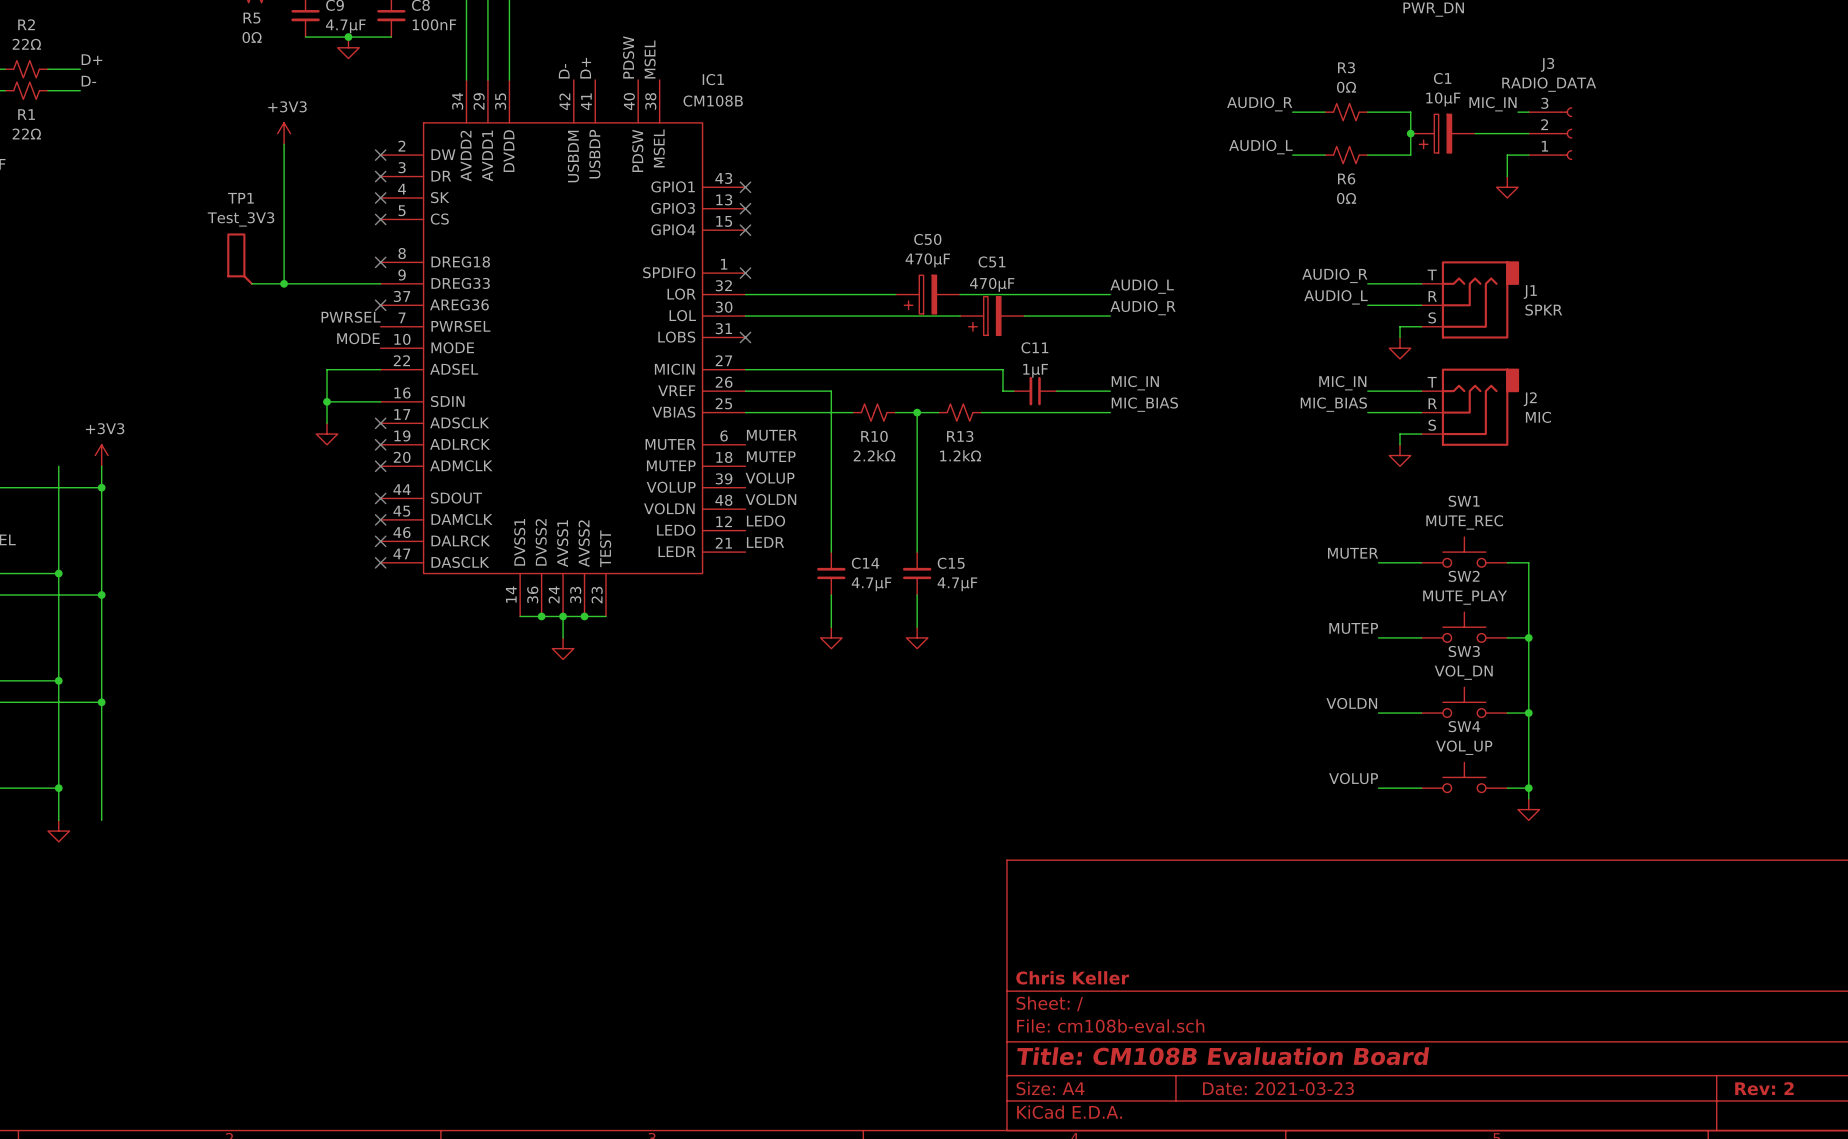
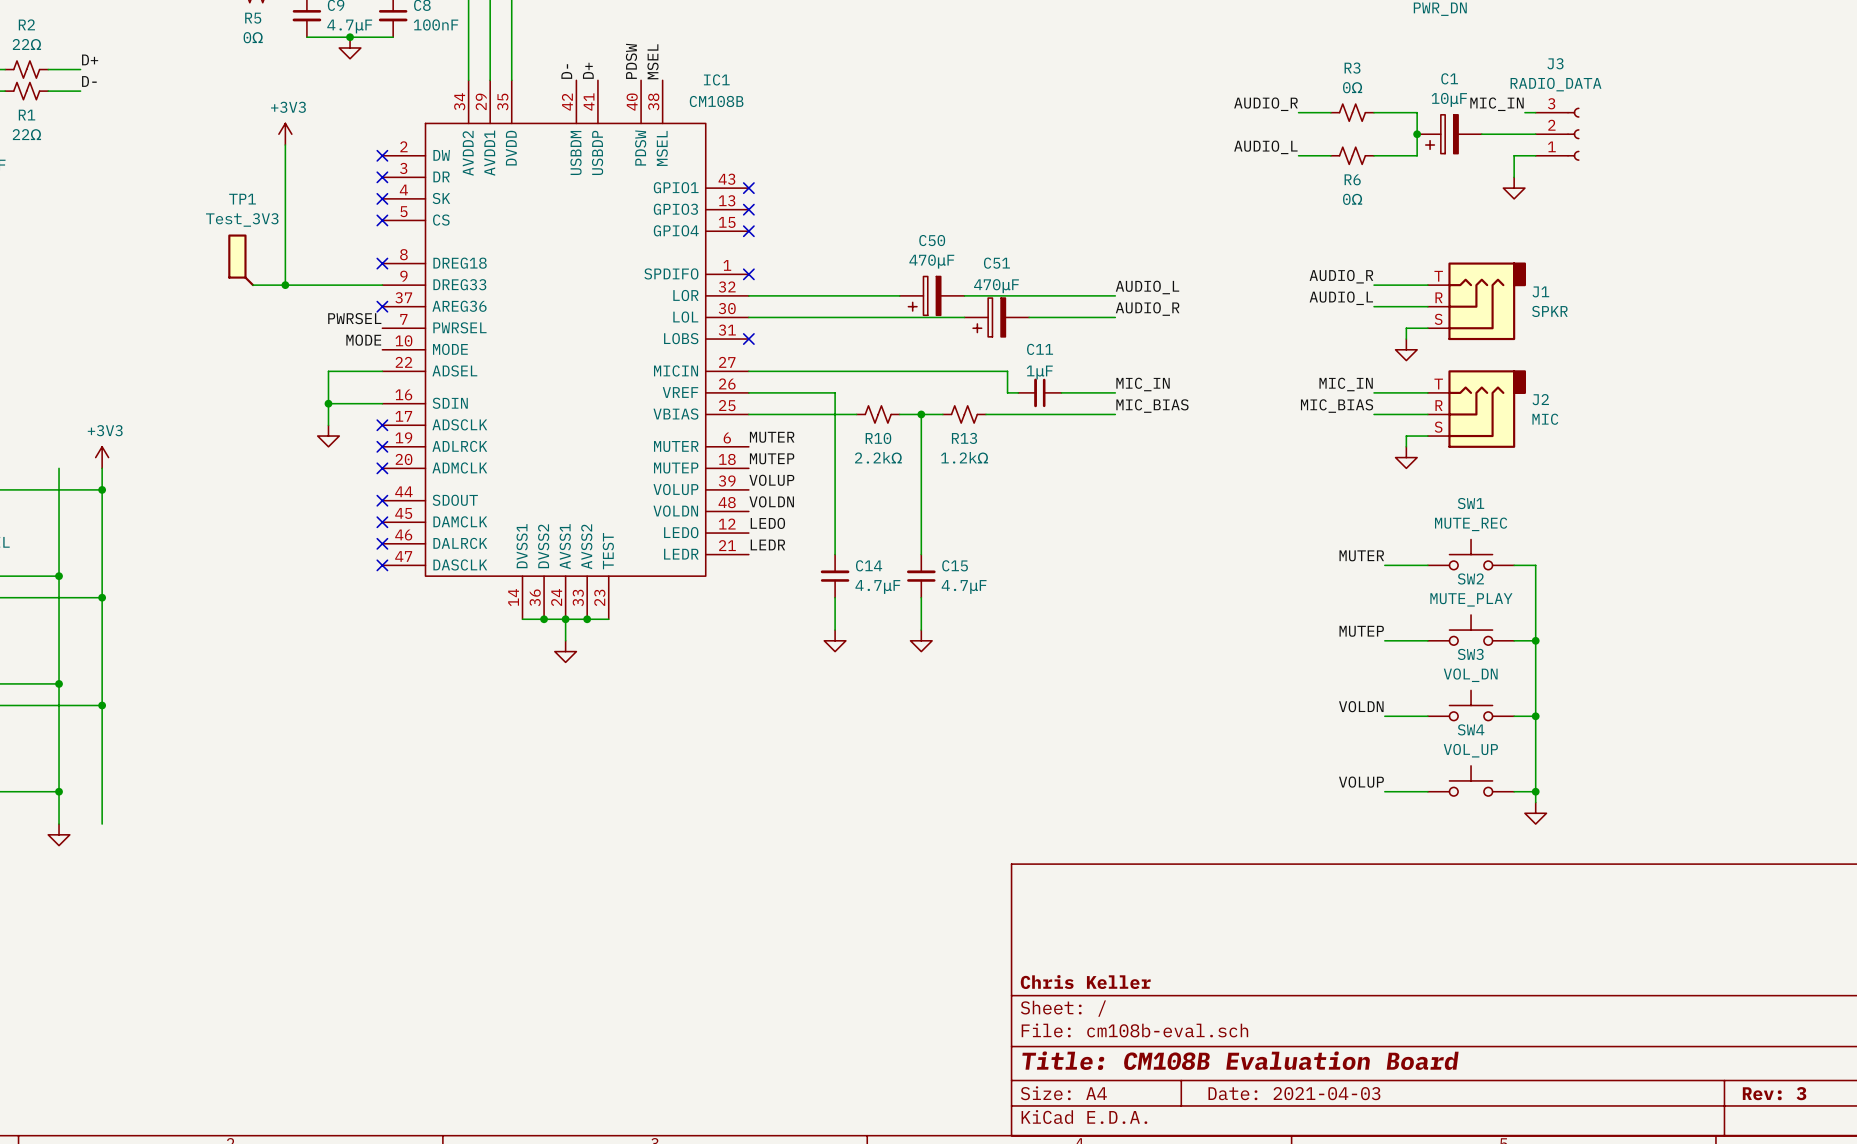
title block: Date: 2021-03-23 (1278, 1088) -> Date: 2021-04-03 (1294, 1093)
title block: Rev: 2 (1764, 1088) -> Rev: 3 (1774, 1093)

